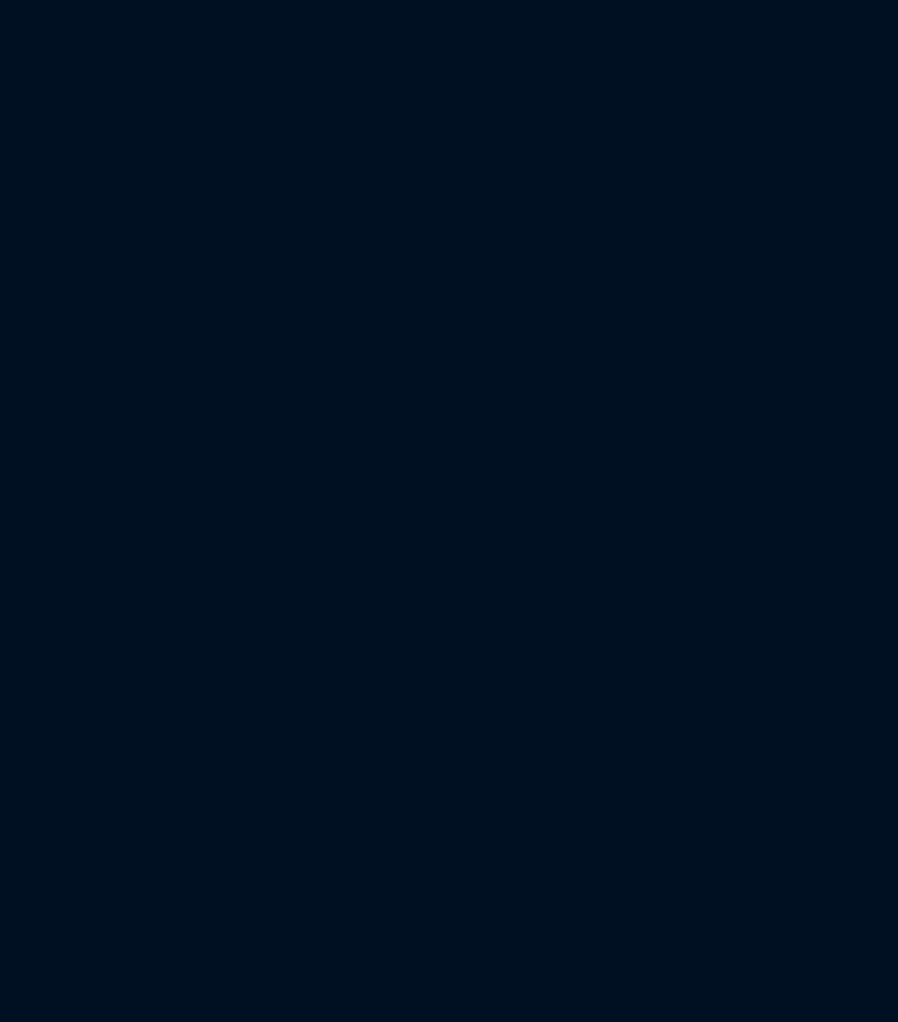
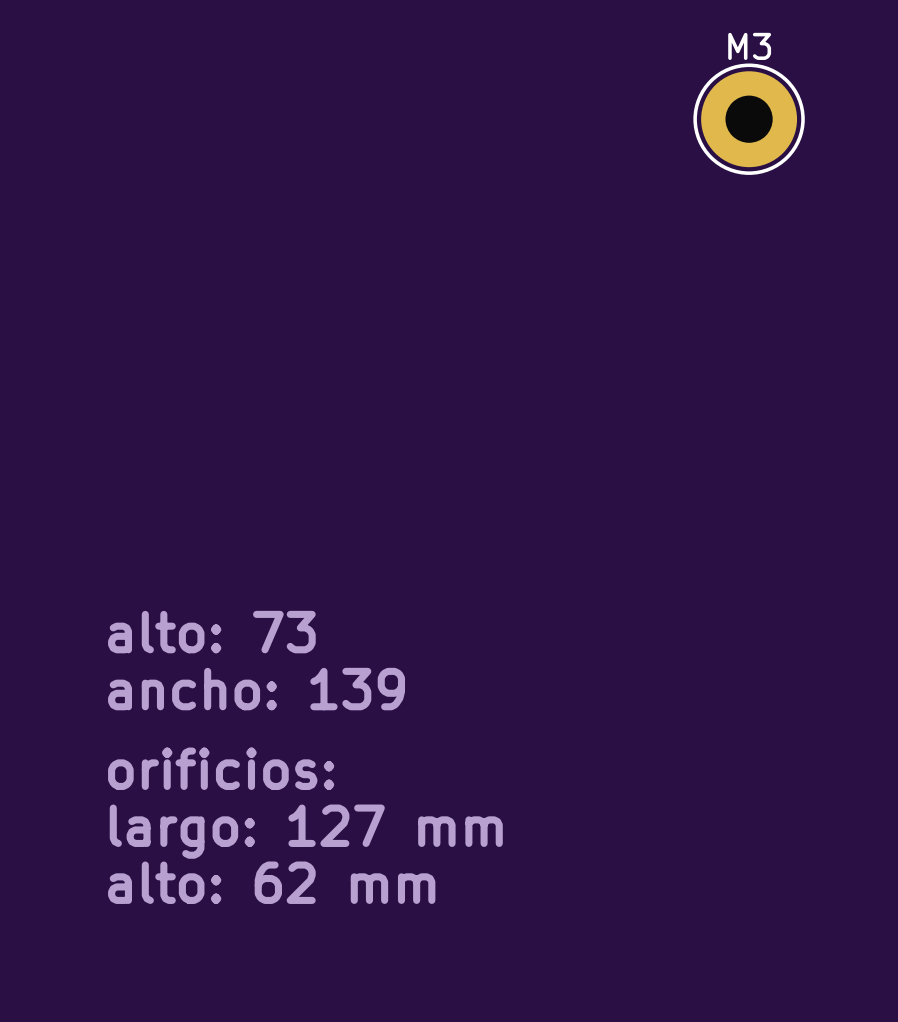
M3: none -> (749, 119)
text: none -> alto: 73 (211, 632)
text: none -> ancho: 139 (256, 689)
text: none -> orificios: (221, 768)
text: none -> largo: 127 mm (306, 831)
text: none -> alto: 62 mm (271, 882)

